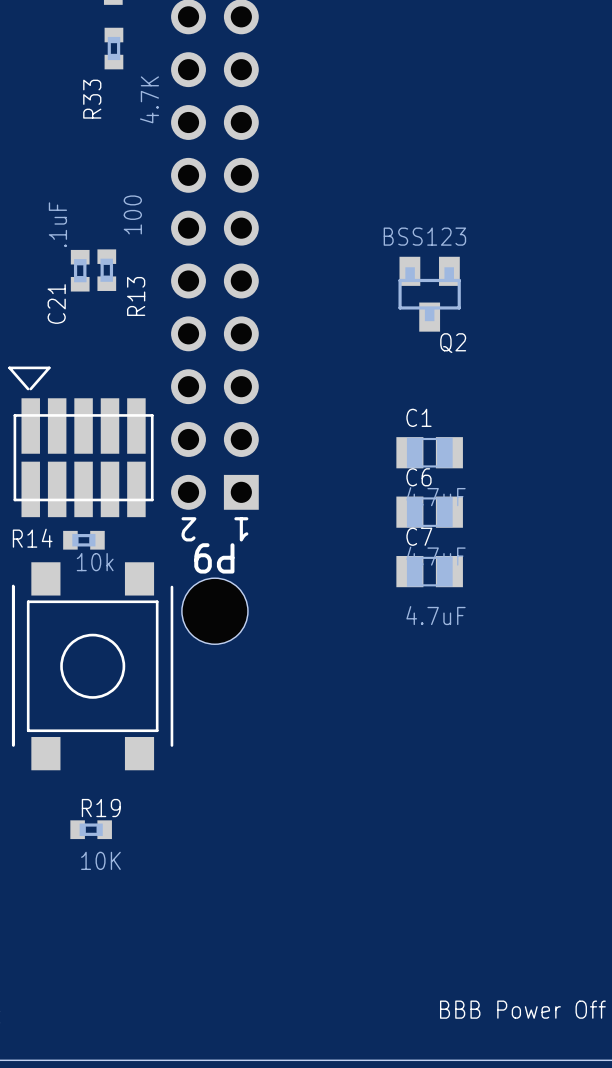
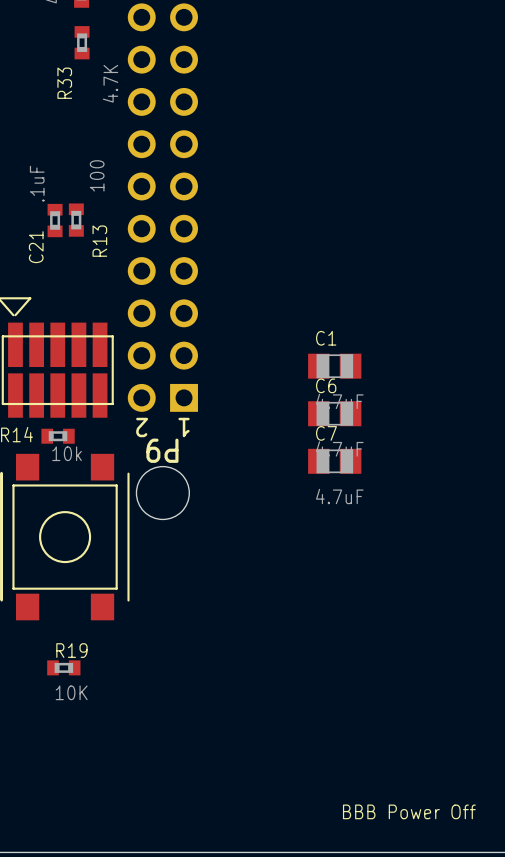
Q2: BSS123 (429, 294) -> none

